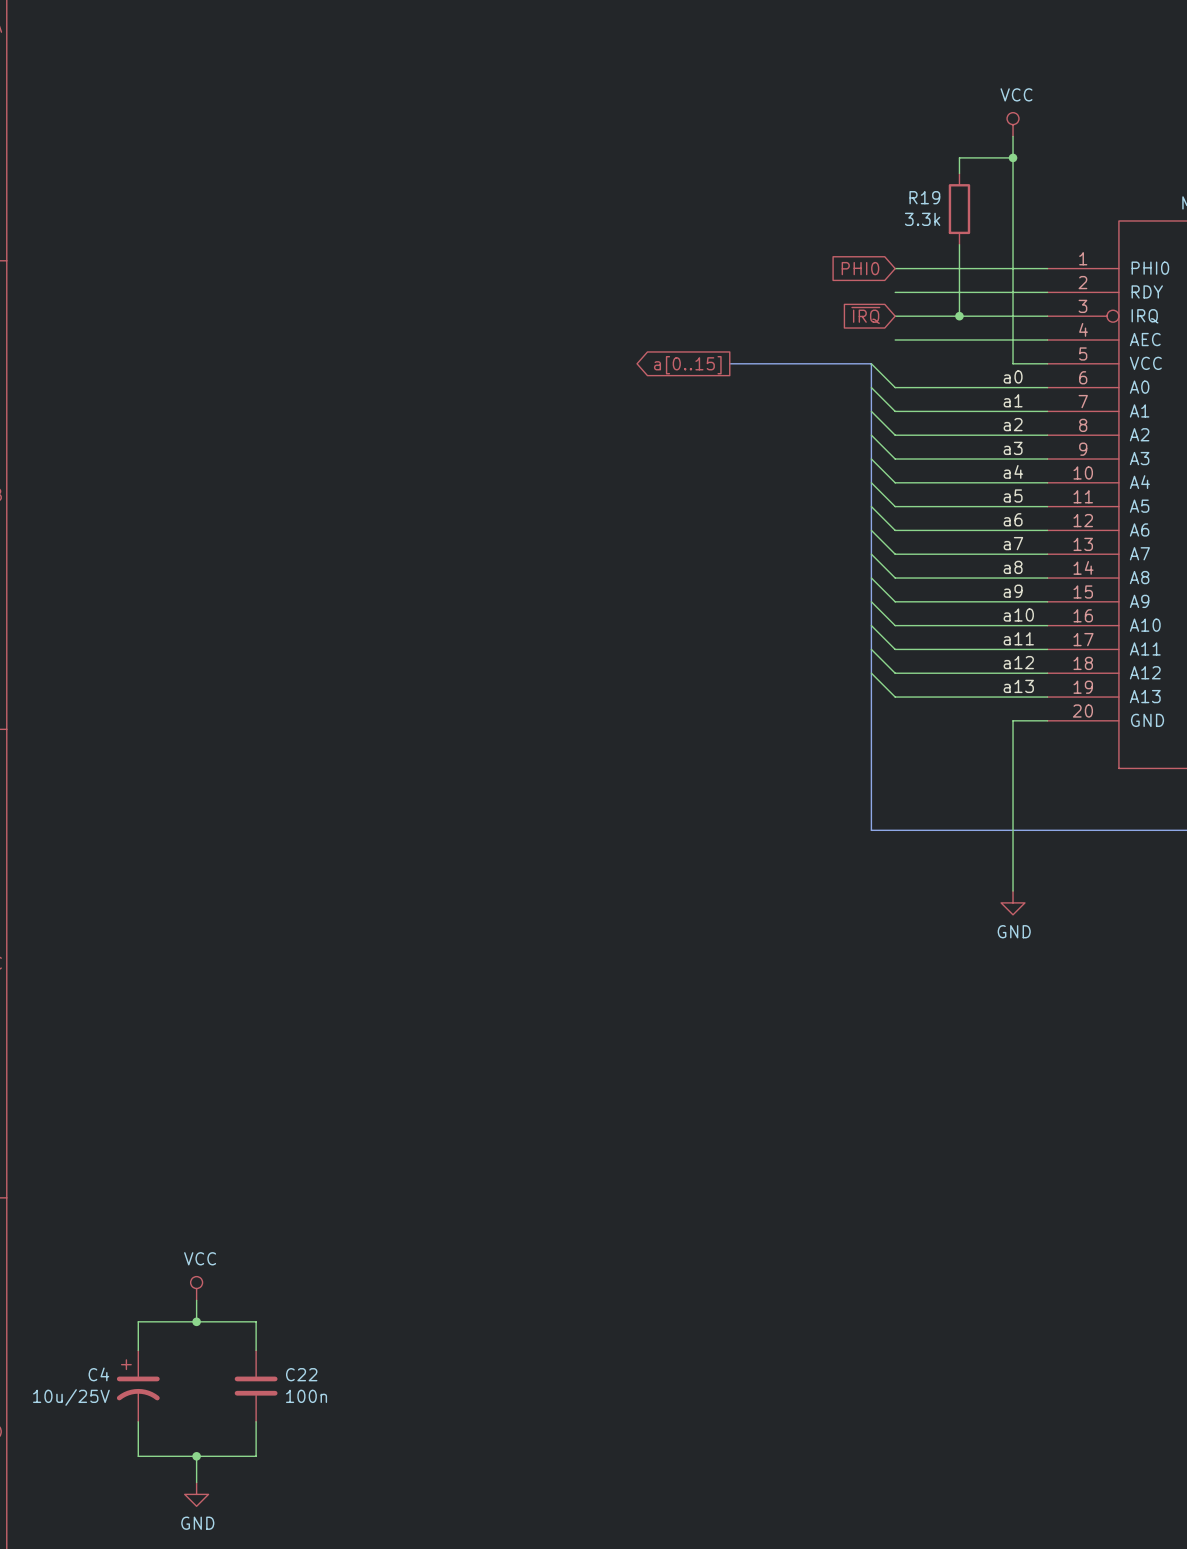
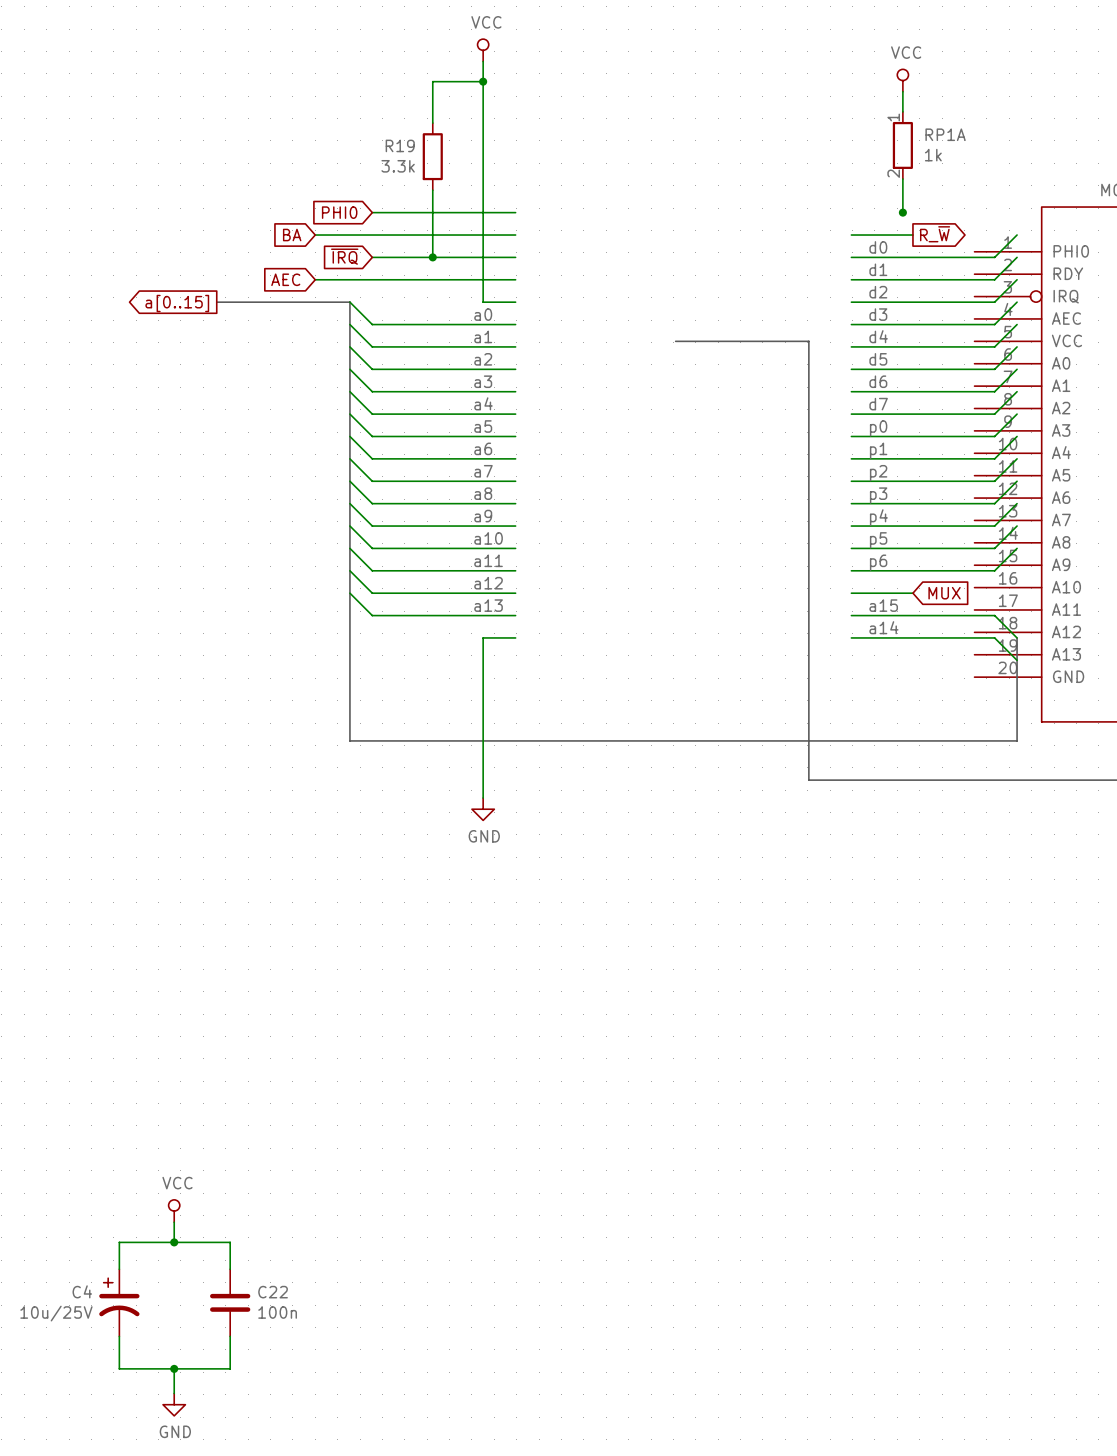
power symbol: none -> VCC (483, 50)
wire: none -> (483, 61) (483, 302) (515, 302)
wire: none -> (483, 81) (432, 81) (432, 123)
junction: none -> (483, 81)
wire: none -> (902, 91) (902, 111)
power symbol position: VCC (1013, 124) -> VCC (902, 80)
wire: (1013, 136) (1013, 363) (1047, 363) -> none
RP1A: none -> 1k (902, 145)
wire: (1013, 157) (959, 157) (959, 173) -> none
junction: (1013, 157) -> none
wire: none -> (902, 179) (902, 212)
wire: none -> (432, 190) (432, 257)
R19 position: (959, 209) -> (432, 156)
global label: none -> PHI0 (339, 212)
wire: none -> (372, 212) (515, 212)
junction: none -> (902, 212)
wire: (959, 244) (959, 316) -> none
global label: none -> R_~{W} (935, 234)
global label: none -> BA (292, 235)
wire: none -> (315, 235) (515, 235)
wire: none -> (851, 235) (912, 235)
wire: none -> (1017, 235) (994, 257) (851, 257)
label: none -> d0 (878, 247)
global label: PHI0 (860, 268) -> none
wire: (895, 268) (1047, 268) -> none
global label: none -> ~{IRQ} (344, 256)
wire: none -> (372, 257) (515, 257)
junction: none -> (432, 257)
wire: none -> (1017, 257) (994, 279) (851, 279)
label: none -> d1 (878, 269)
wire: (895, 292) (1047, 292) -> none
global label: none -> AEC (285, 279)
wire: none -> (315, 279) (515, 279)
wire: none -> (1017, 279) (994, 302) (851, 302)
label: none -> d2 (878, 292)
global label: ~{IRQ} (865, 315) -> none
wire: (895, 316) (1047, 316) -> none
junction: (959, 316) -> none
bus: none -> (216, 302) (349, 302) (349, 740) (1017, 740) (1017, 637)
wire: none -> (349, 302) (372, 324) (515, 324)
wire: none -> (1017, 302) (994, 324) (851, 324)
global label: none -> a[0..15] (177, 303)
label: none -> a0 (483, 314)
label: none -> d3 (878, 314)
wire: (895, 340) (1047, 340) -> none
wire: none -> (349, 324) (372, 346) (515, 346)
wire: none -> (1017, 324) (994, 346) (851, 346)
label: none -> d4 (878, 336)
label: none -> a1 (483, 336)
wire: (871, 363) (895, 387) (1047, 387) -> none
global label: a[0..15] (687, 365) -> none
wire: none -> (349, 346) (372, 369) (515, 369)
wire: none -> (1017, 346) (994, 369) (851, 369)
label: a0 (1013, 376) -> none
label: none -> a2 (483, 359)
label: none -> d5 (878, 359)
wire: (871, 387) (895, 411) (1047, 411) -> none
wire: none -> (349, 369) (372, 391) (515, 391)
wire: none -> (1017, 369) (994, 391) (851, 391)
label: a1 (1013, 400) -> none
label: none -> a3 (483, 381)
label: none -> d6 (878, 381)
wire: (871, 411) (895, 435) (1047, 435) -> none
wire: none -> (349, 391) (372, 414) (515, 414)
wire: none -> (1017, 391) (994, 414) (851, 414)
label: a2 (1013, 424) -> none
label: none -> a4 (483, 403)
label: none -> d7 (878, 404)
wire: (871, 435) (895, 459) (1047, 459) -> none
wire: none -> (349, 414) (372, 436) (515, 436)
wire: none -> (1017, 414) (994, 436) (851, 436)
label: a3 (1013, 448) -> none
label: none -> a5 (483, 426)
label: none -> p0 (878, 428)
wire: (871, 459) (895, 482) (1047, 482) -> none
wire: none -> (349, 436) (372, 458) (515, 458)
wire: none -> (1017, 436) (994, 458) (851, 458)
label: a4 (1013, 471) -> none
label: none -> a6 (483, 448)
label: none -> p1 (878, 450)
wire: (871, 482) (895, 506) (1047, 506) -> none
wire: none -> (349, 458) (372, 481) (515, 481)
wire: none -> (1017, 458) (994, 481) (851, 481)
label: a5 (1013, 495) -> none
label: none -> a7 (483, 471)
label: none -> p2 (878, 473)
wire: (871, 506) (895, 530) (1047, 530) -> none
wire: none -> (349, 481) (372, 503) (515, 503)
wire: none -> (1017, 481) (994, 503) (851, 503)
label: a6 (1013, 519) -> none
label: none -> a8 (483, 493)
label: none -> p3 (878, 495)
wire: (871, 530) (895, 554) (1047, 554) -> none
wire: none -> (349, 503) (372, 526) (515, 526)
wire: none -> (1017, 503) (994, 526) (851, 526)
label: a7 (1013, 543) -> none
label: none -> a9 (483, 516)
label: none -> p4 (878, 517)
wire: (871, 554) (895, 578) (1047, 578) -> none
wire: none -> (349, 526) (372, 548) (515, 548)
wire: none -> (1017, 526) (994, 548) (851, 548)
label: a8 (1013, 567) -> none
label: none -> a10 (488, 538)
label: none -> p5 (878, 540)
wire: (871, 578) (895, 601) (1047, 601) -> none
wire: none -> (349, 548) (372, 570) (515, 570)
wire: none -> (1017, 548) (994, 570) (851, 570)
label: a9 (1013, 591) -> none
label: none -> a11 (488, 560)
label: none -> p6 (878, 562)
wire: (871, 601) (895, 625) (1047, 625) -> none
wire: none -> (349, 570) (372, 593) (515, 593)
label: a10 (1018, 615) -> none
label: none -> a12 (488, 583)
wire: (871, 625) (895, 649) (1047, 649) -> none
wire: none -> (349, 593) (372, 615) (515, 615)
wire: none -> (851, 593) (912, 593)
global label: none -> MUX (944, 593)
label: a11 (1018, 638) -> none
label: none -> a13 (488, 605)
label: none -> a15 (883, 605)
wire: (871, 649) (895, 673) (1047, 673) -> none
wire: none -> (851, 615) (994, 615) (1017, 637)
label: a12 (1018, 662) -> none
label: none -> a14 (883, 627)
wire: (871, 673) (895, 697) (1047, 697) -> none
wire: none -> (515, 637) (483, 637) (483, 798)
wire: none -> (851, 637) (994, 637) (1017, 660)
label: a13 (1018, 686) -> none
wire: (1047, 720) (1013, 720) (1013, 891) -> none
power symbol: none -> GND (483, 809)
power symbol: GND (1013, 902) -> none

